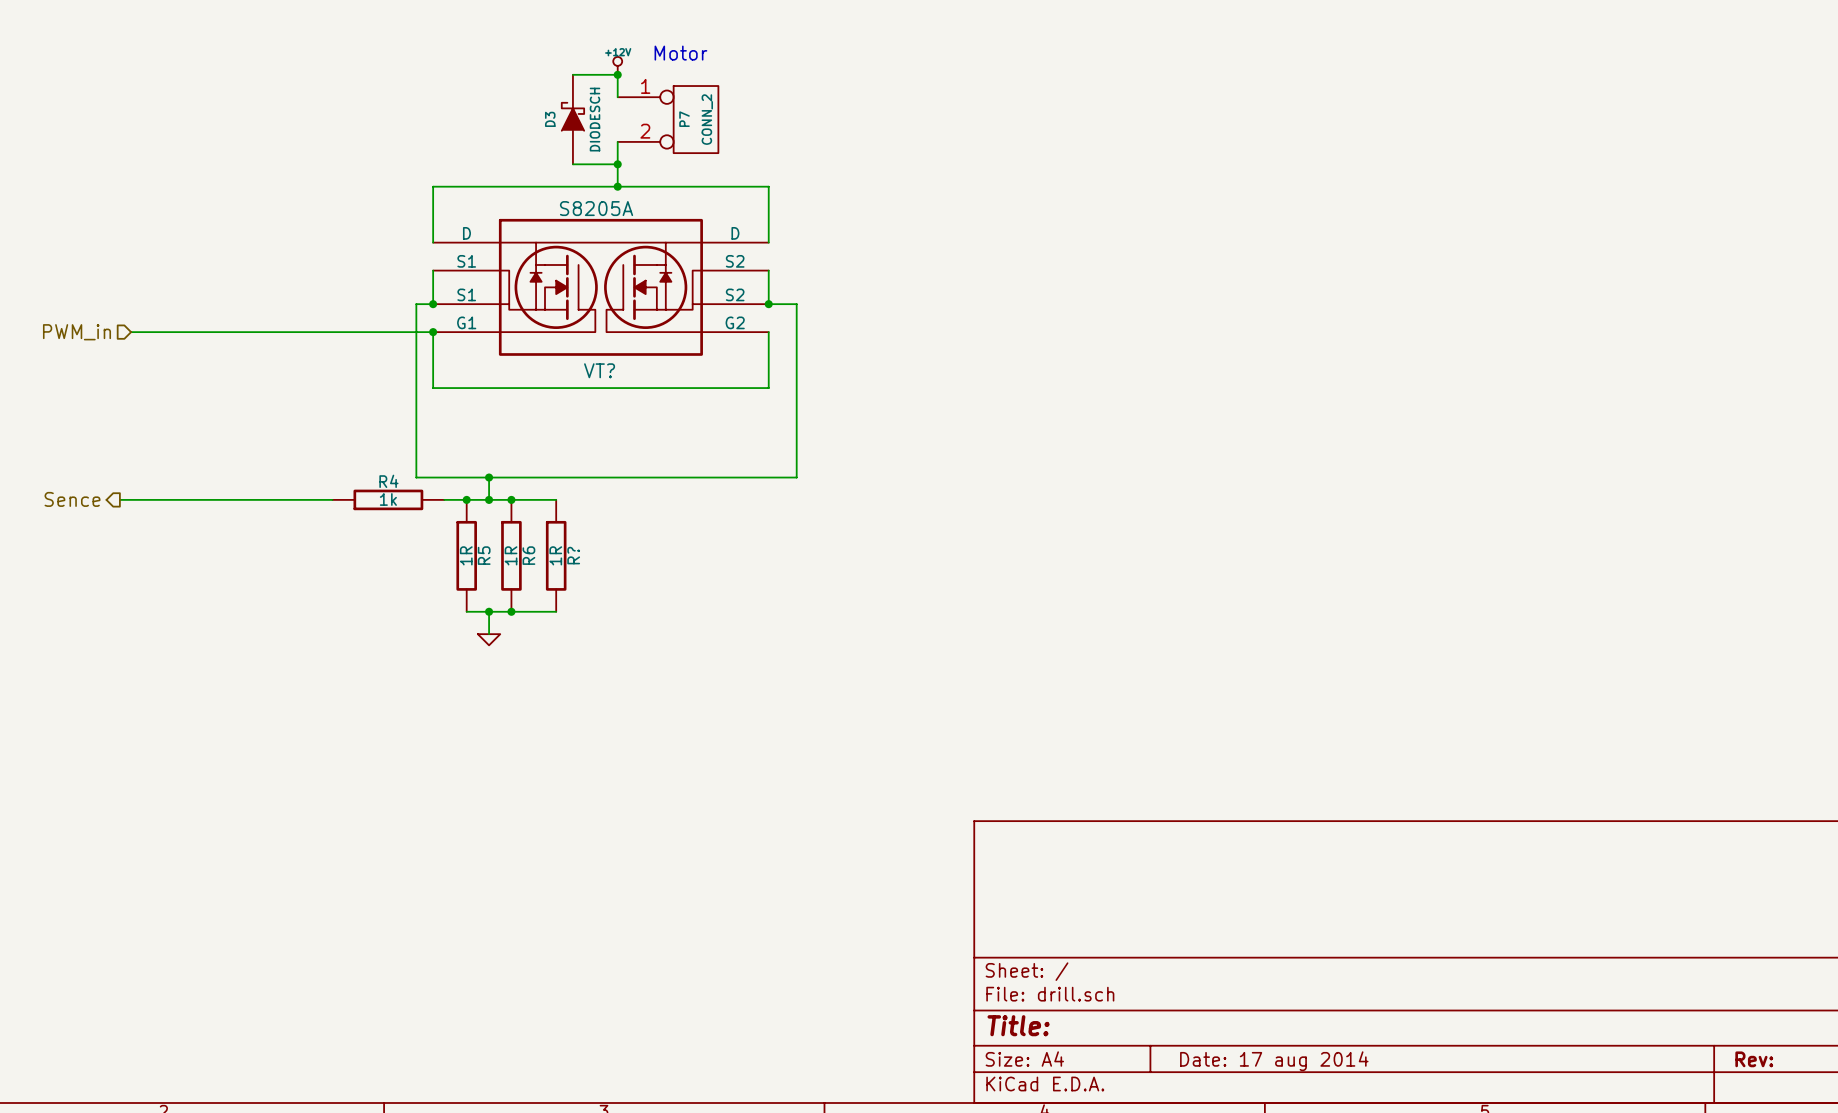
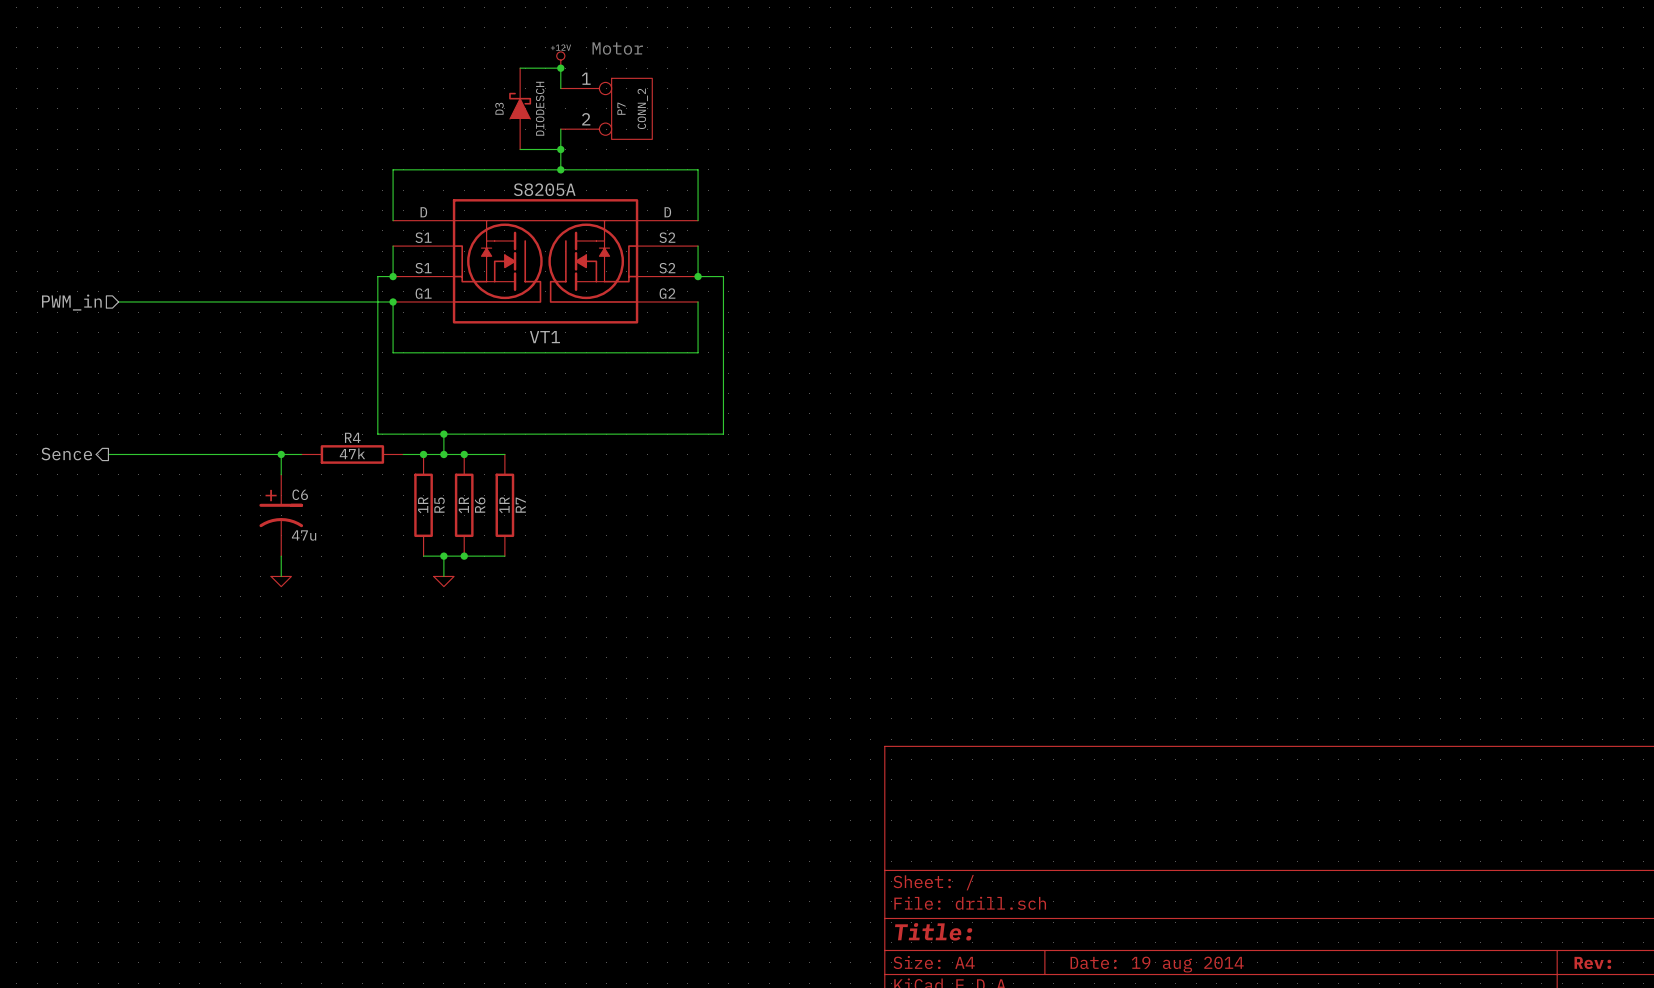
VT? name: VT? (599, 370) -> VT1 (544, 337)
wire: none -> (281, 454) (281, 474)
junction: none -> (281, 454)
R4 value: 1k (388, 499) -> 47k (352, 453)
R? name: R? (573, 555) -> R7 (520, 505)
C6: none -> 47u (281, 515)
wire: none -> (281, 556) (281, 576)
power symbol: none -> (281, 581)
title block: Date: 17 aug 2014 (1274, 1061) -> Date: 19 aug 2014 (1157, 964)

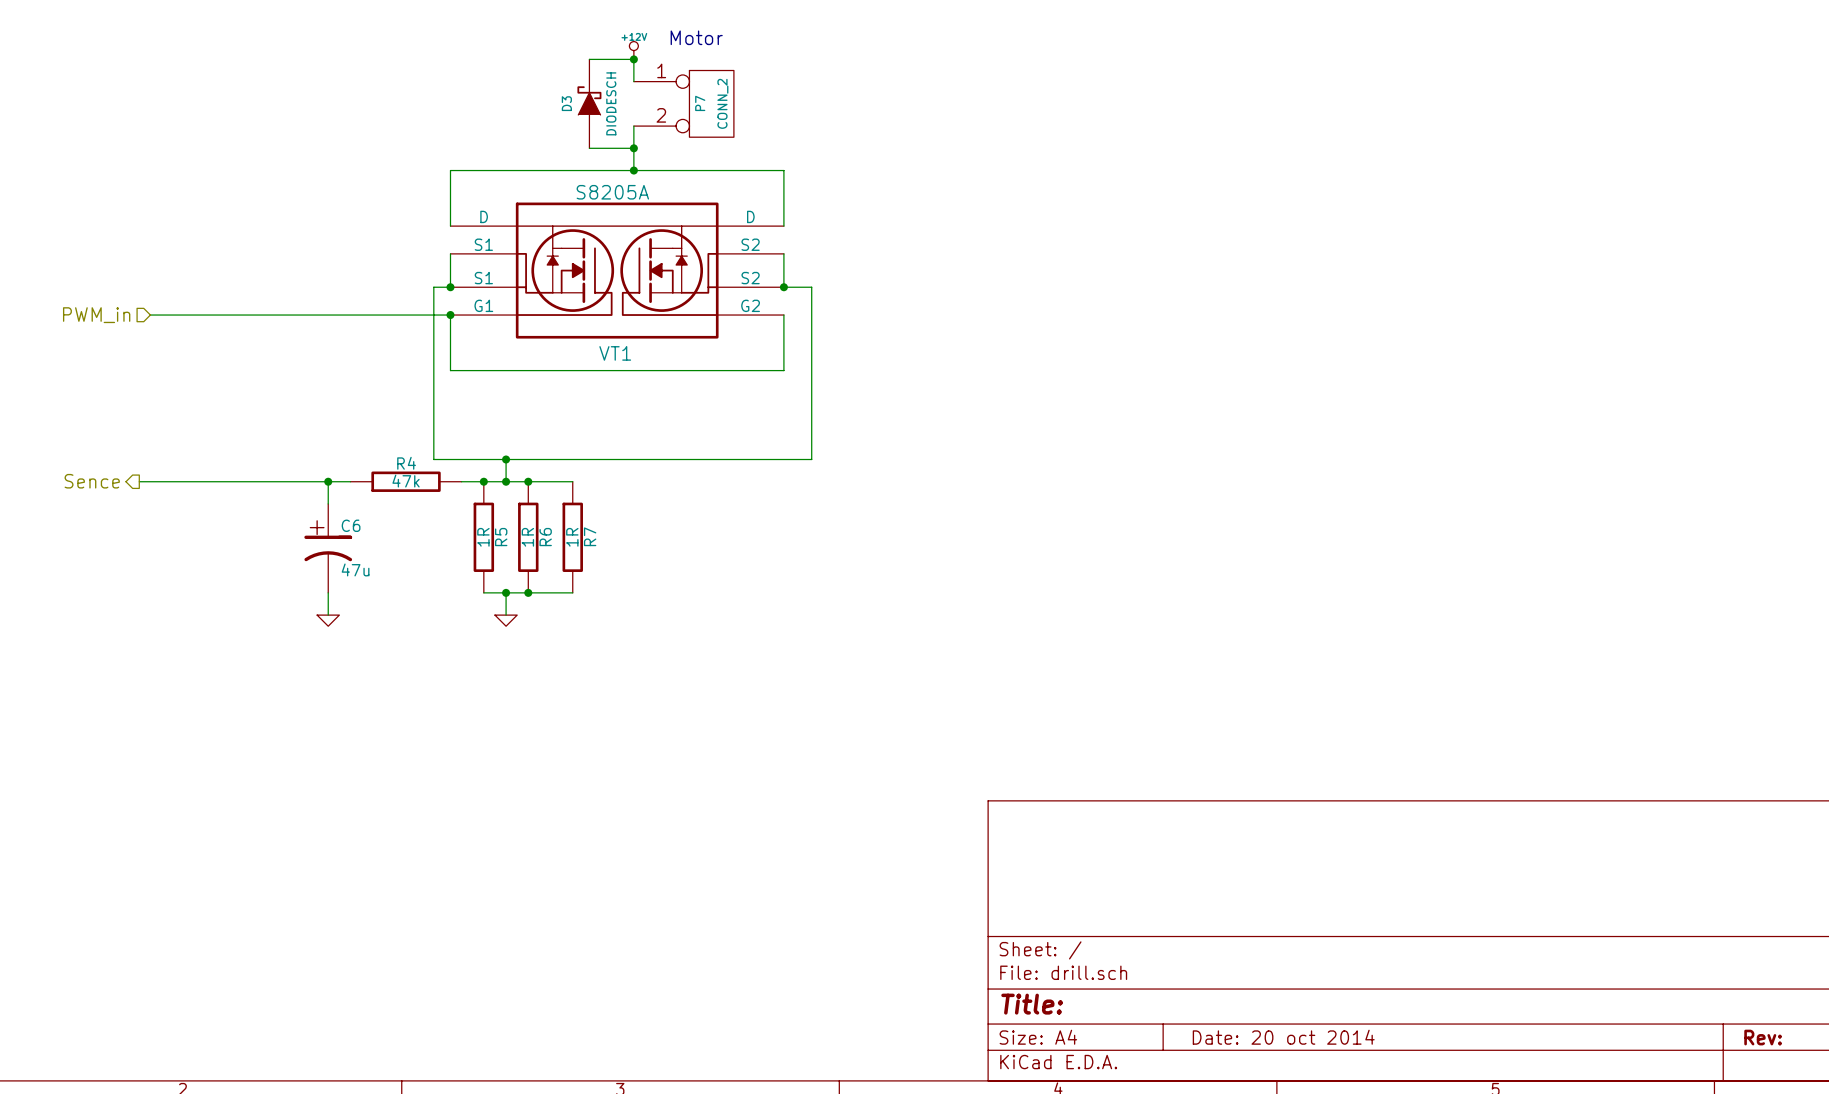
title block: Date: 19 aug 2014 (1157, 964) -> Date: 20 oct 2014 (1283, 1037)

